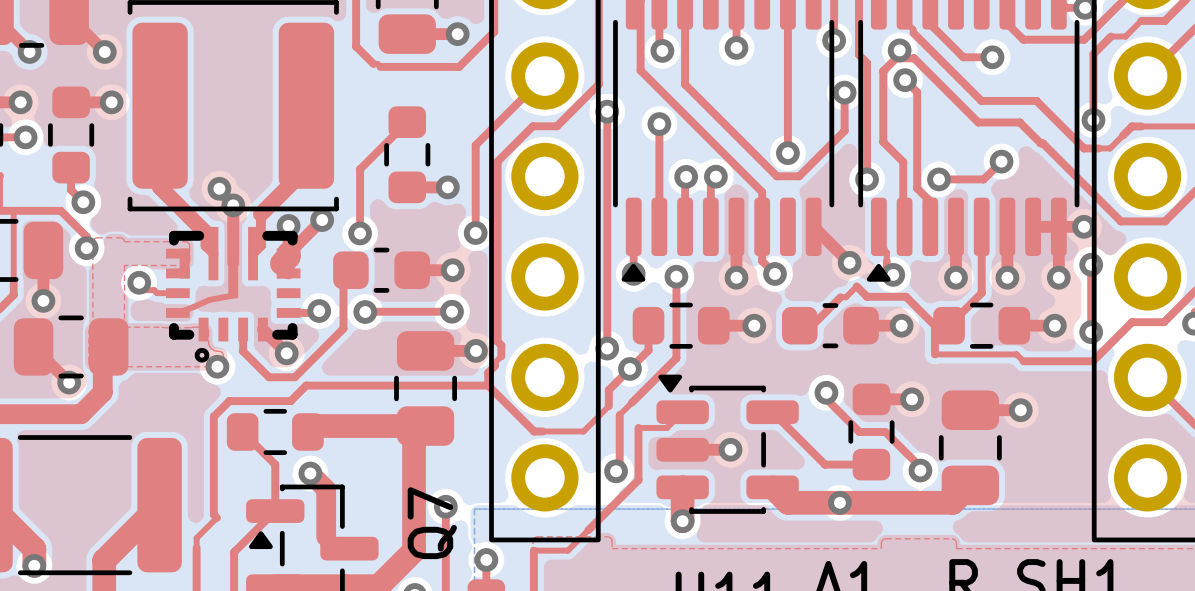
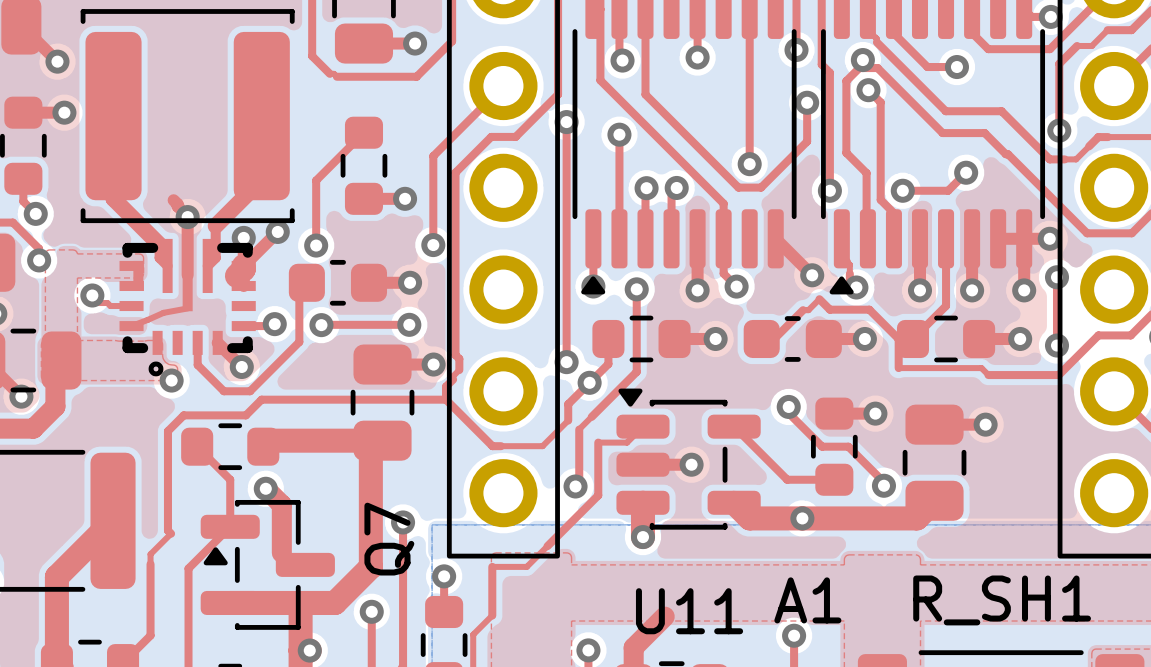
via: (219, 188) -> none

